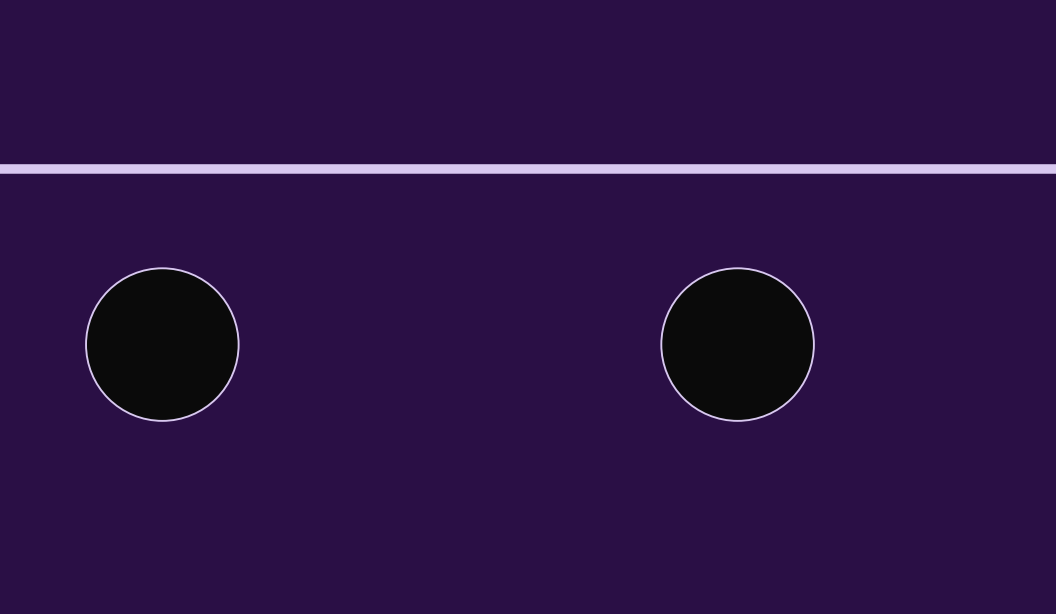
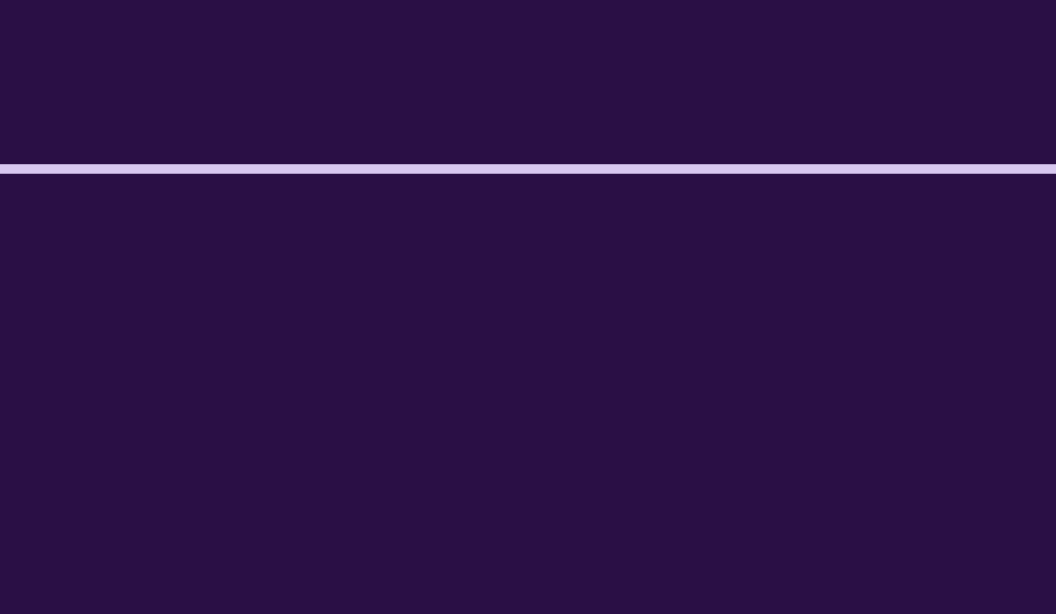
part: (162, 344) -> none
part: (737, 344) -> none

